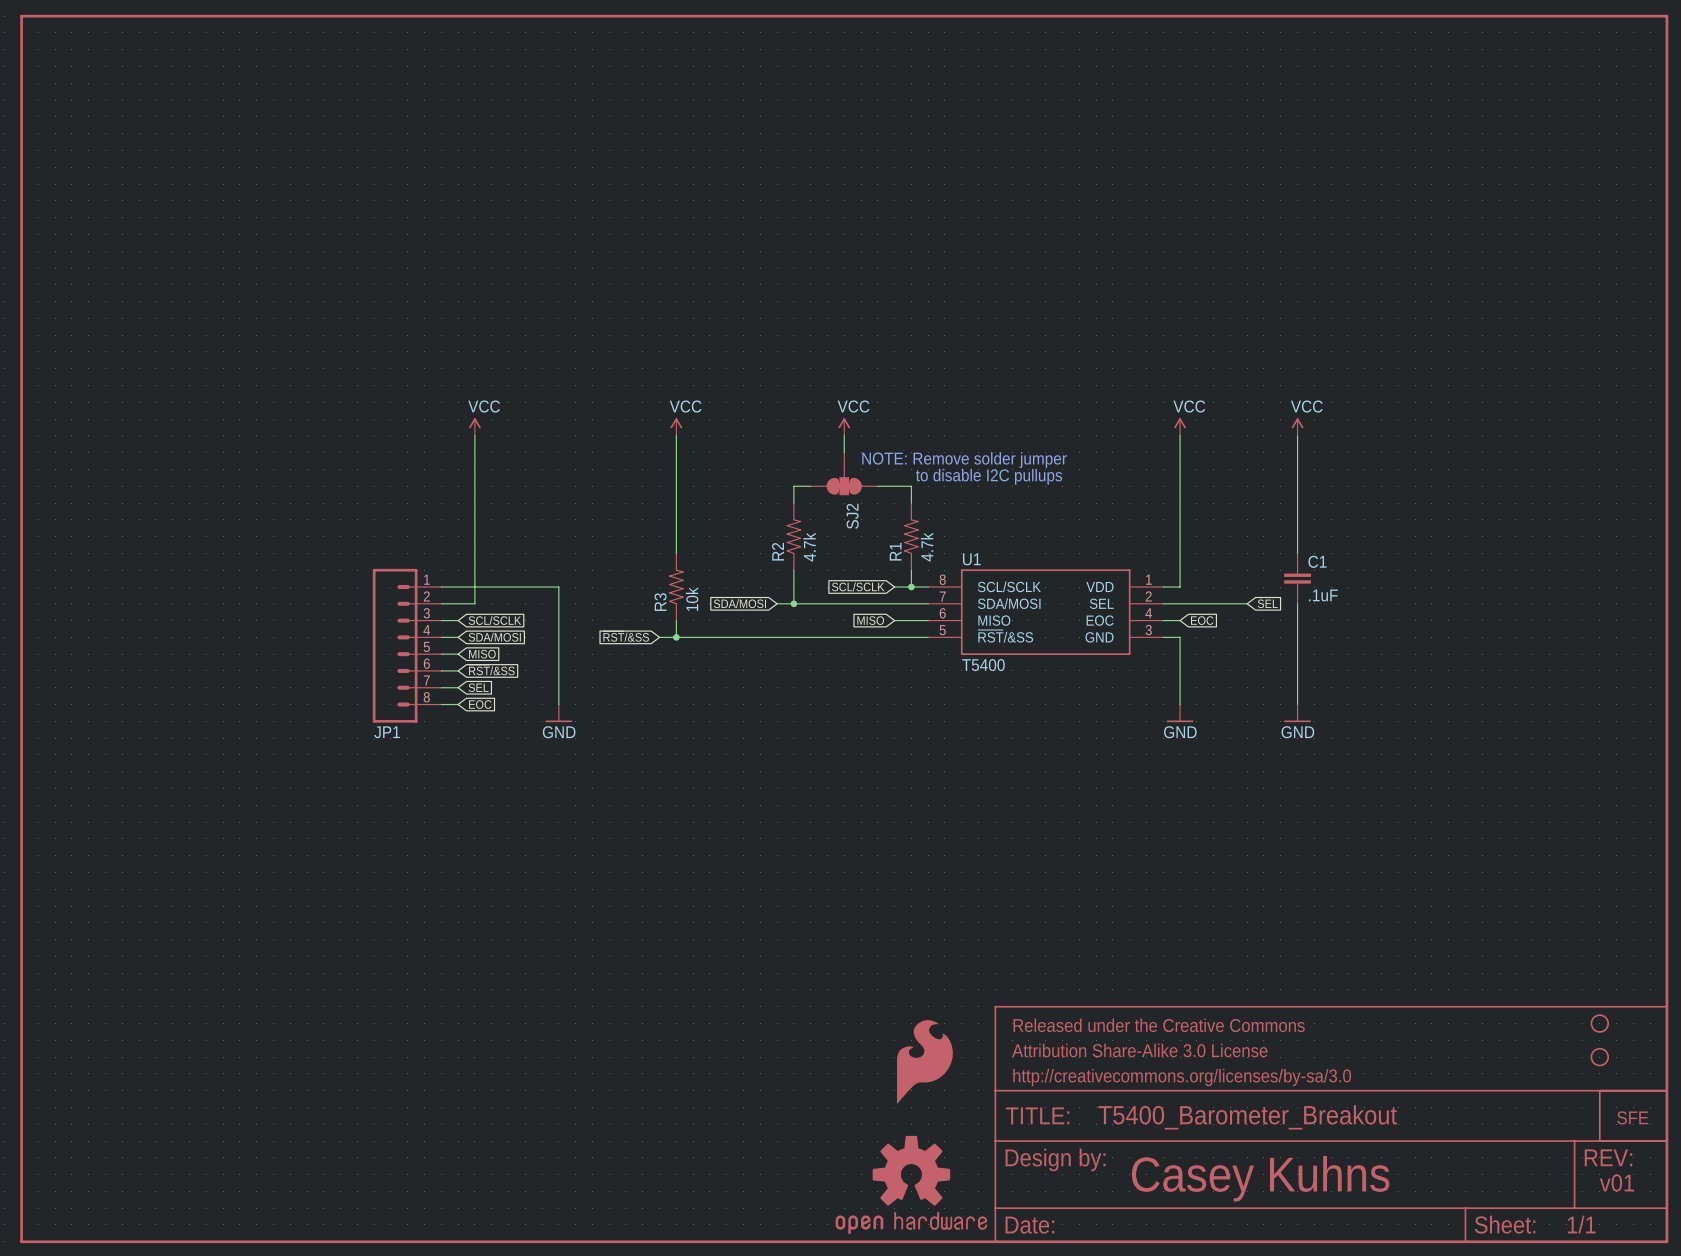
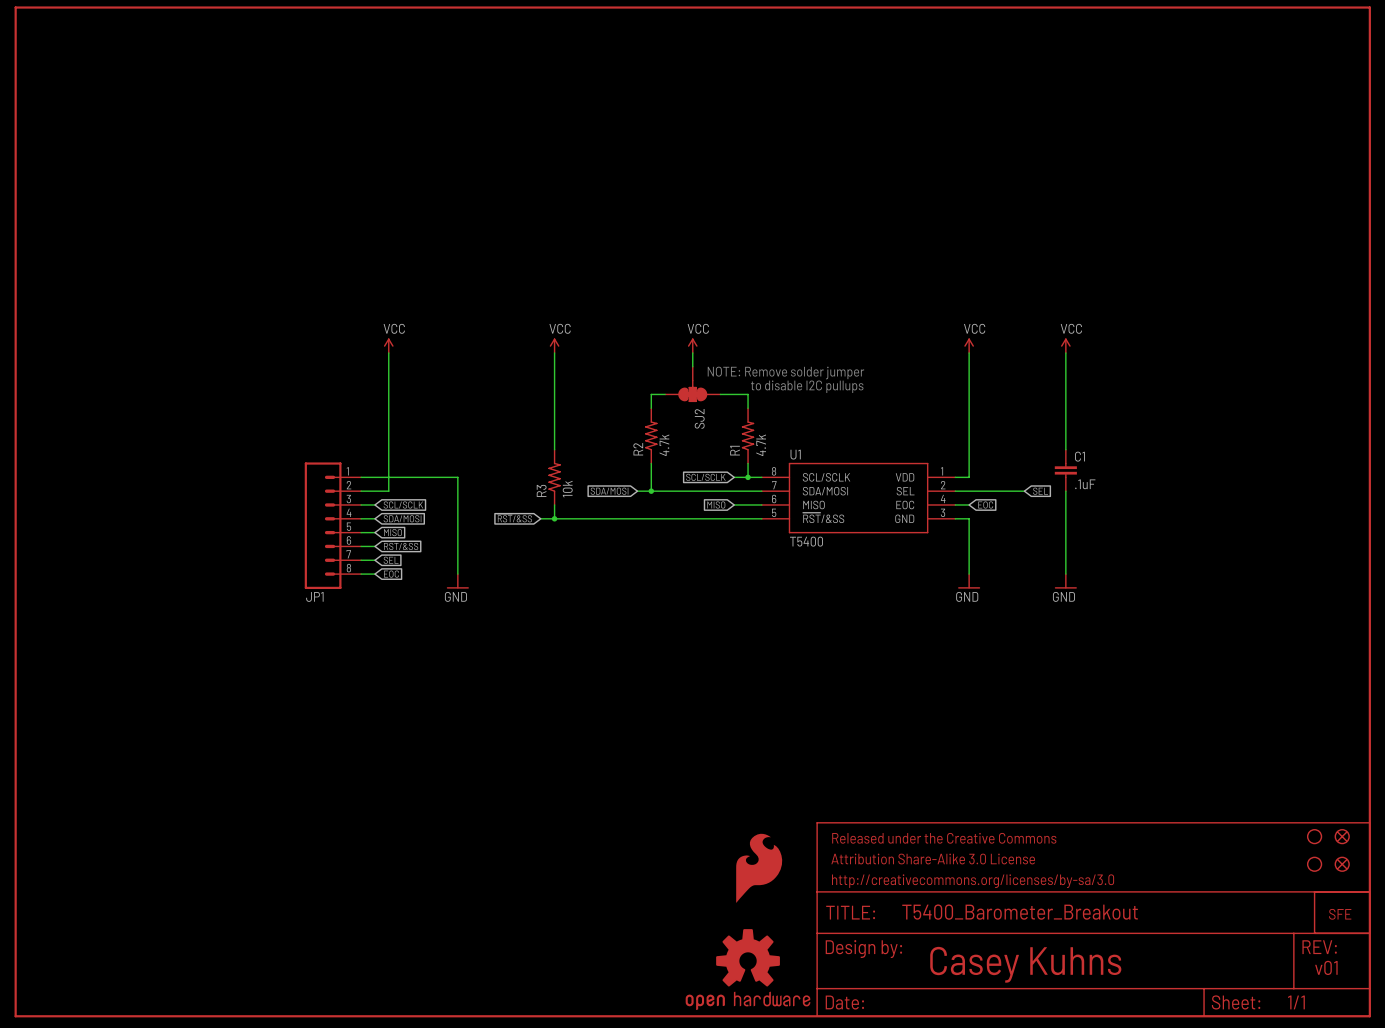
part: none -> (1342, 836)
part: none -> (1342, 864)

